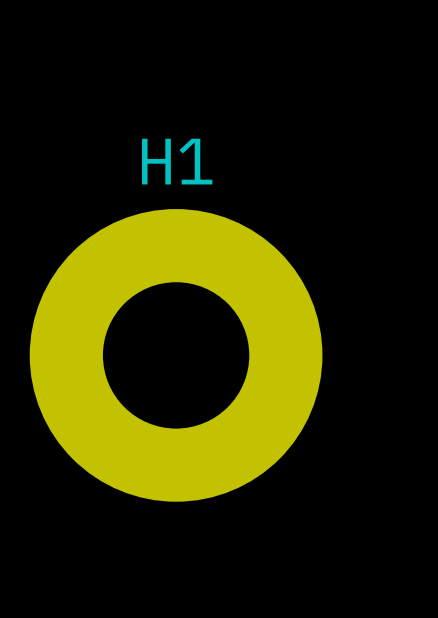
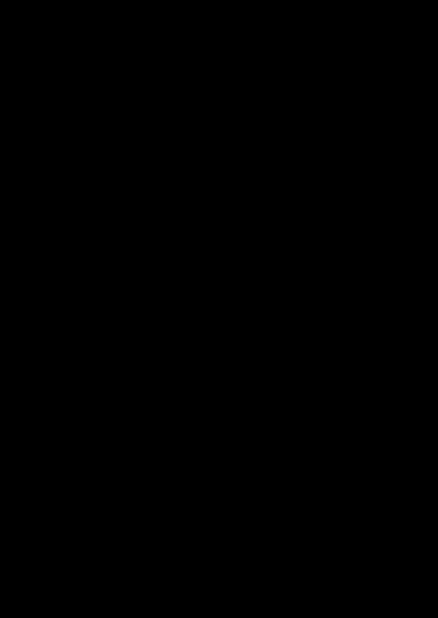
H1: (176, 355) -> none

